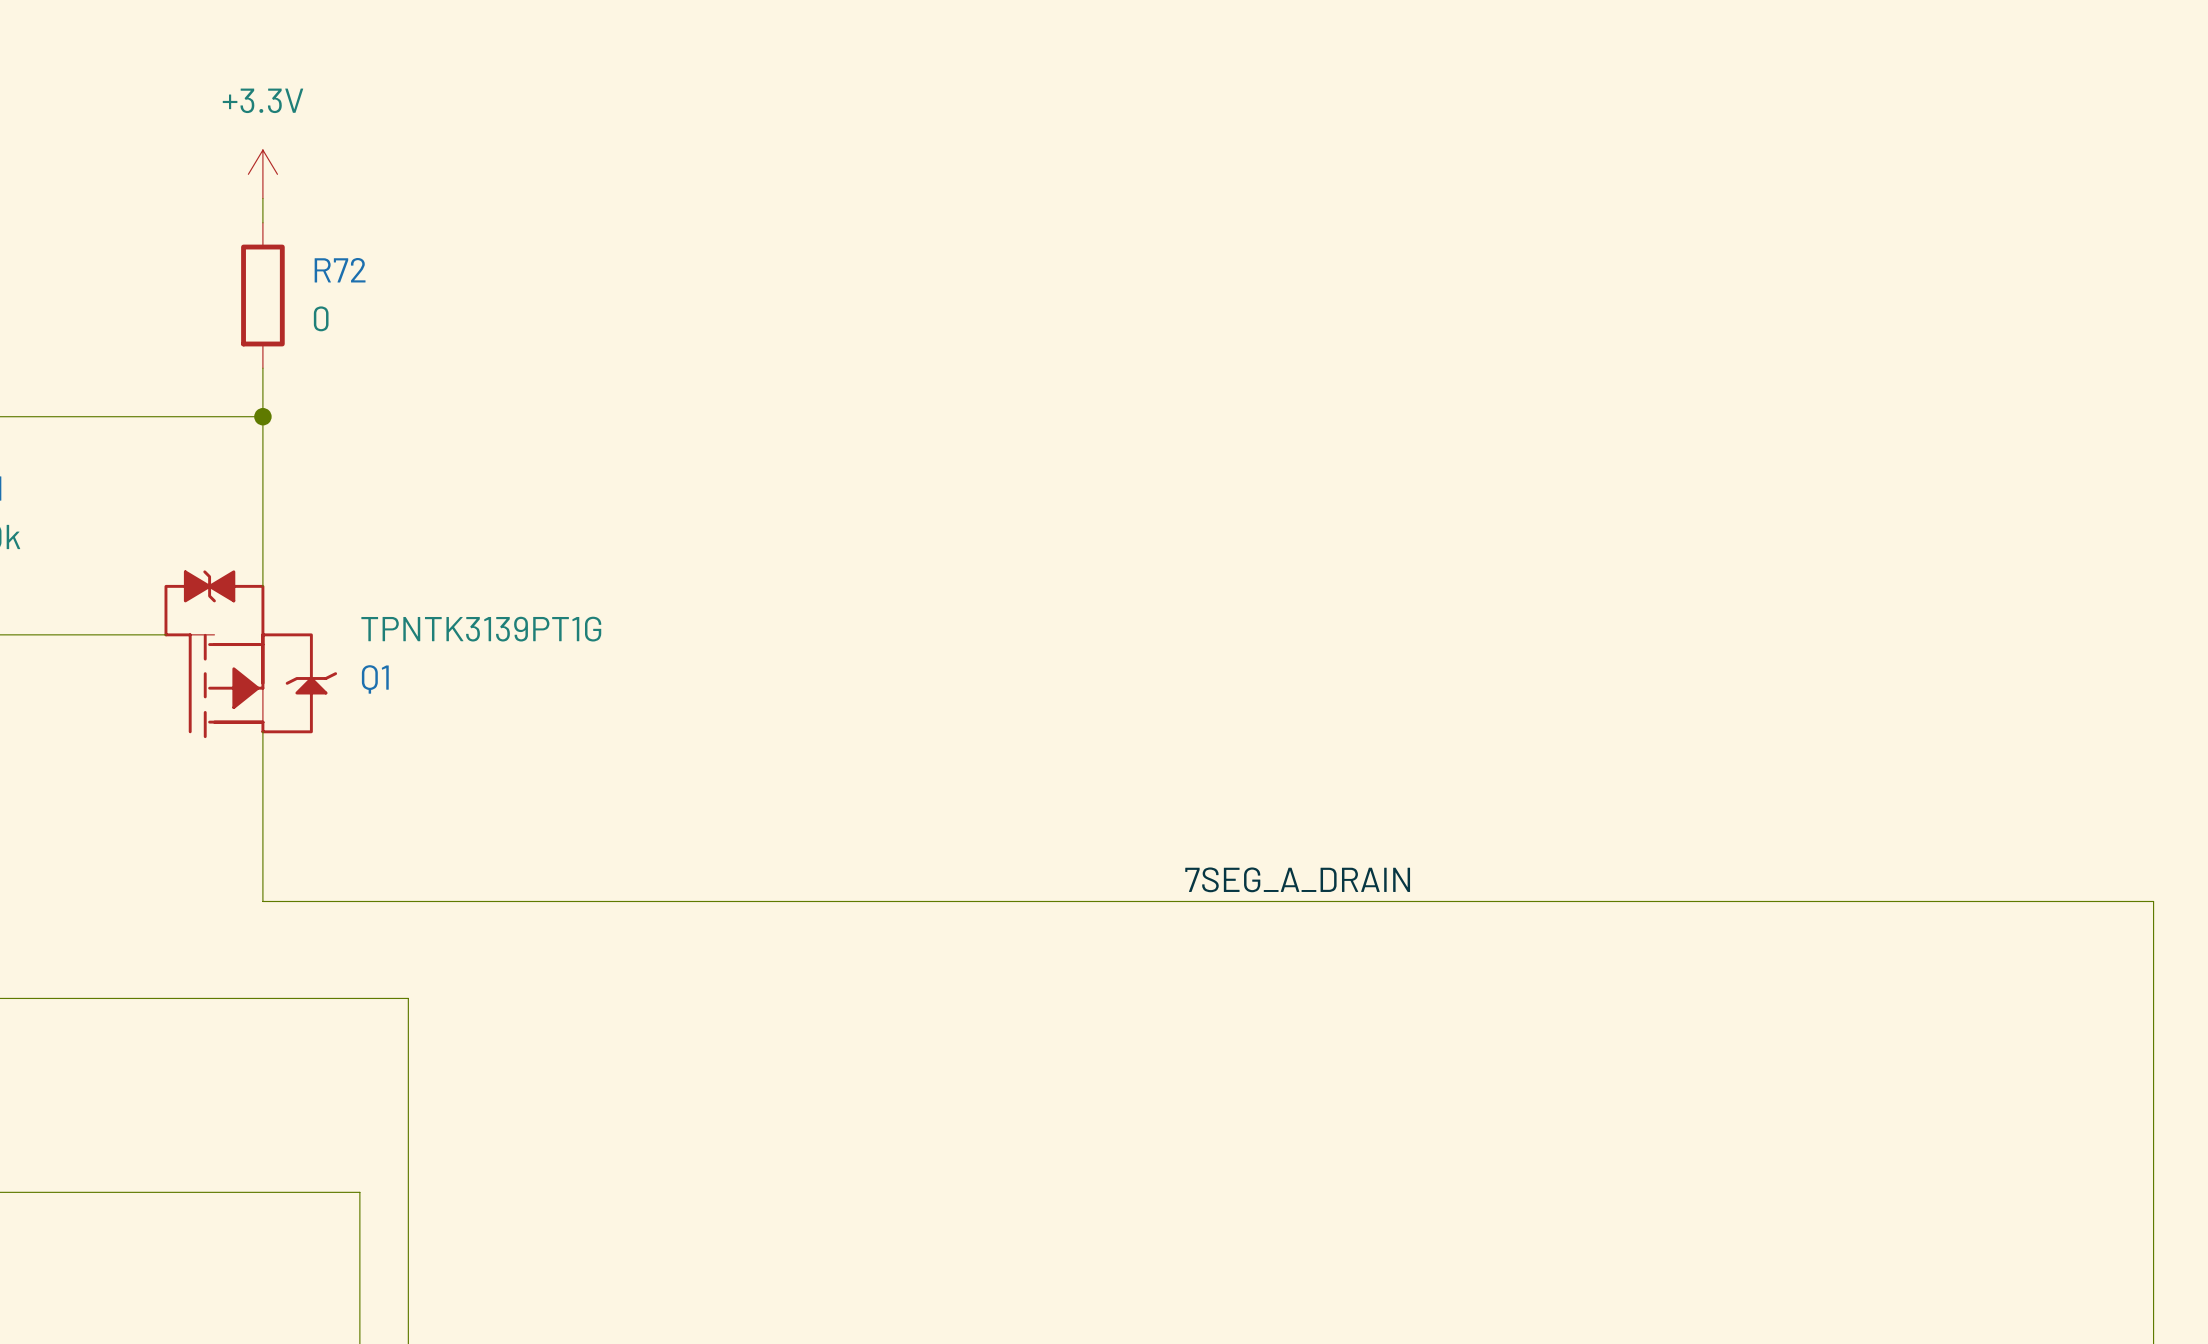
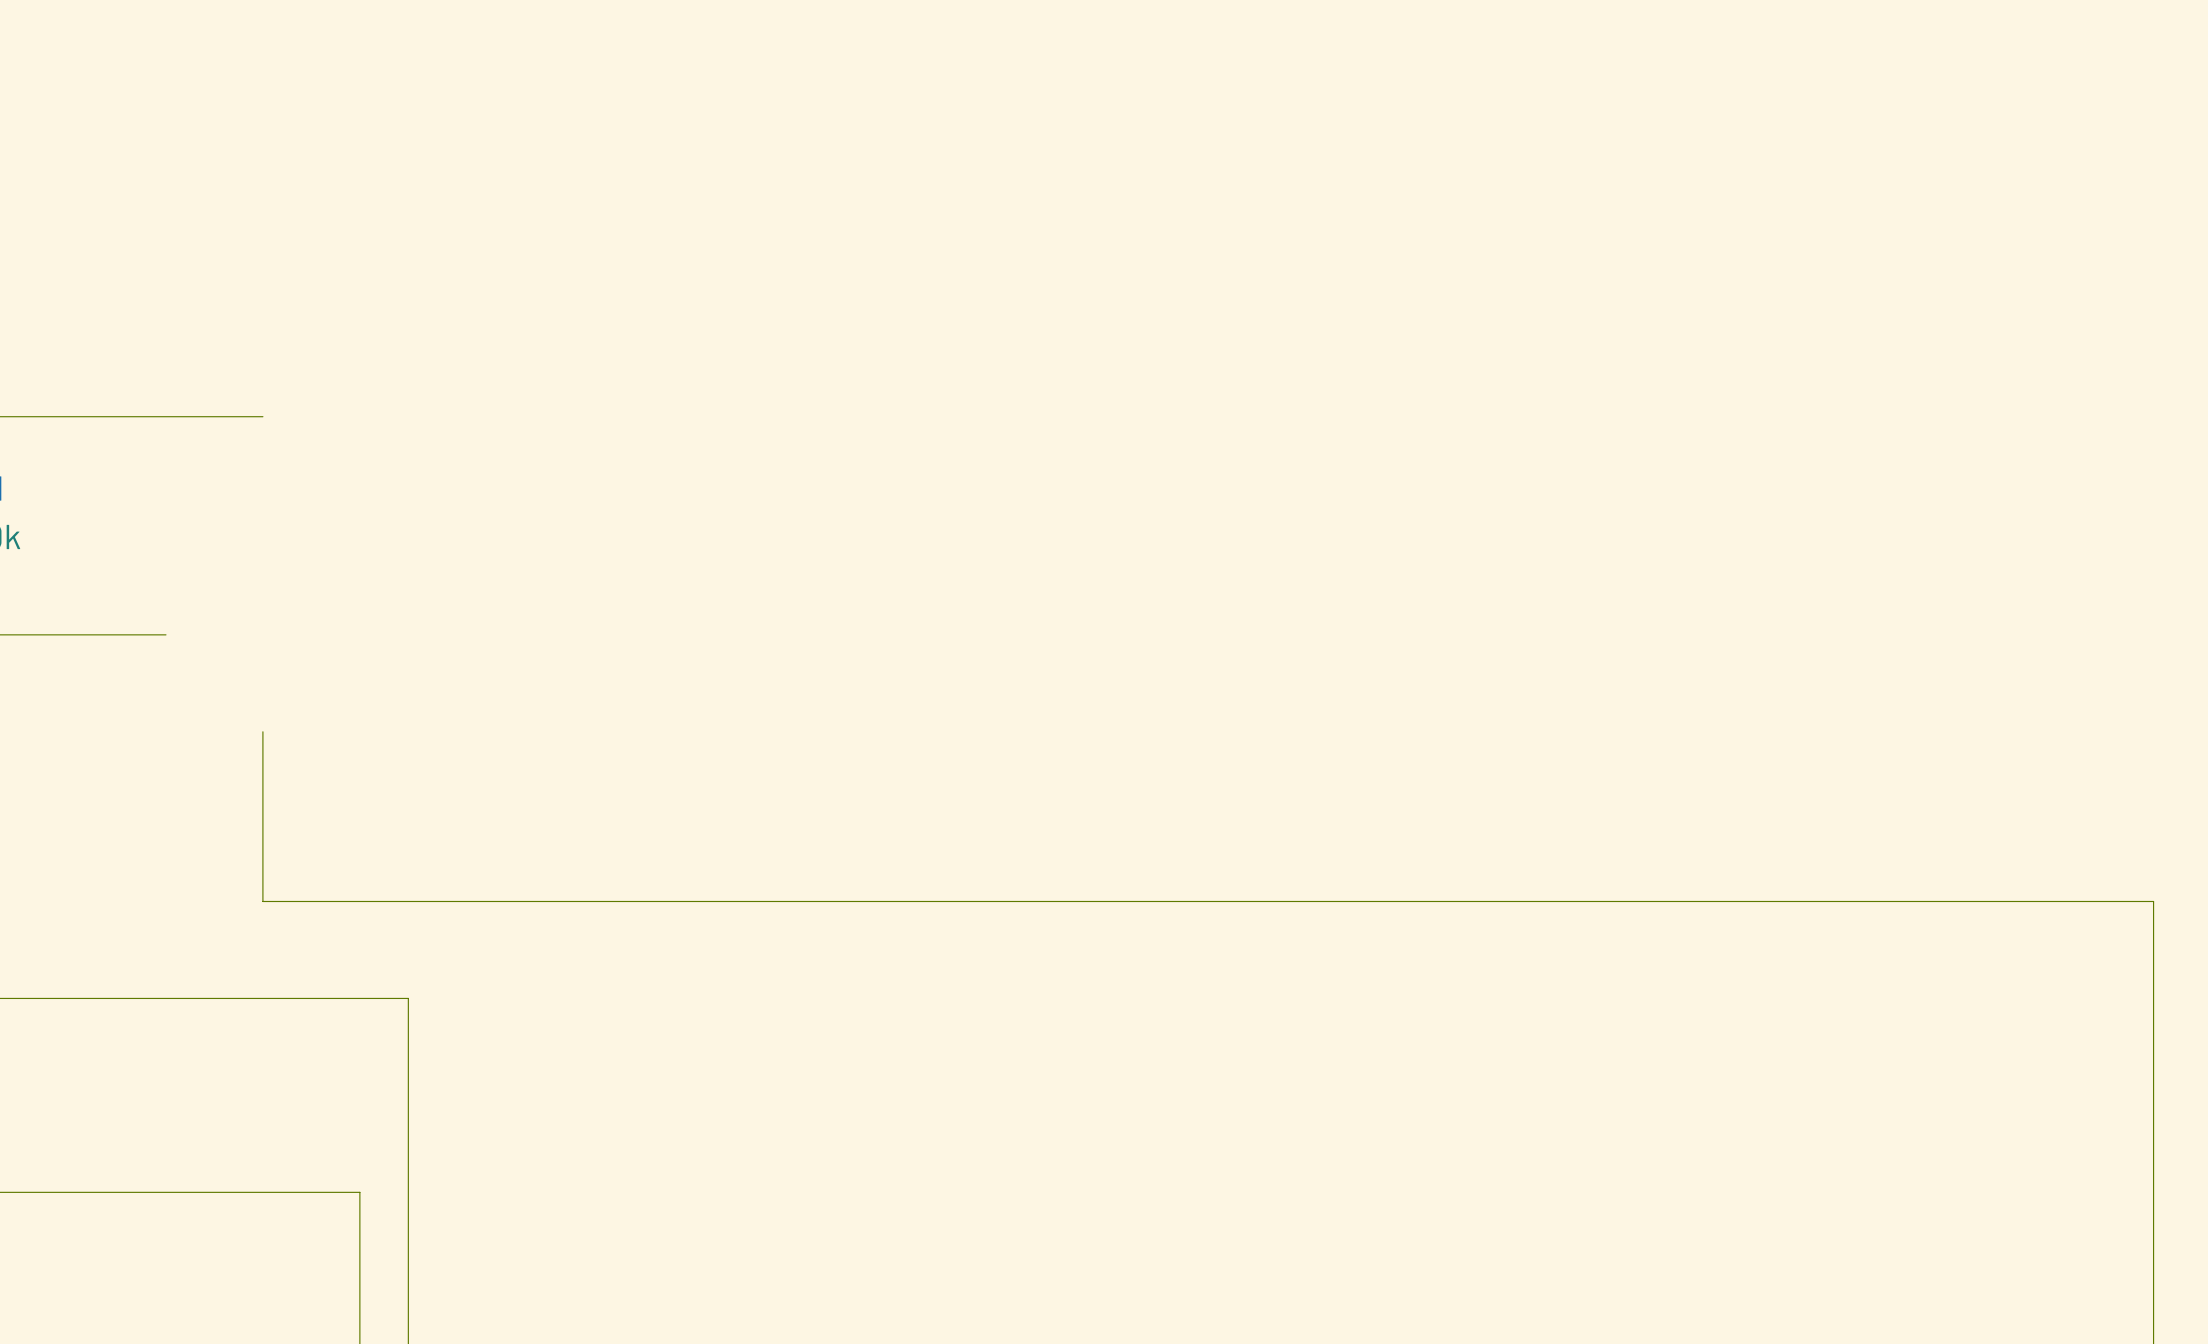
power symbol: +3.3V (262, 174) -> none
wire: (262, 198) (262, 222) -> none
R72: 0 (262, 295) -> none
wire: (262, 368) (262, 586) -> none
junction: (262, 416) -> none
Q1: TPNTK3139PT1G (250, 654) -> none
label: 7SEG_A_DRAIN (1297, 879) -> none

